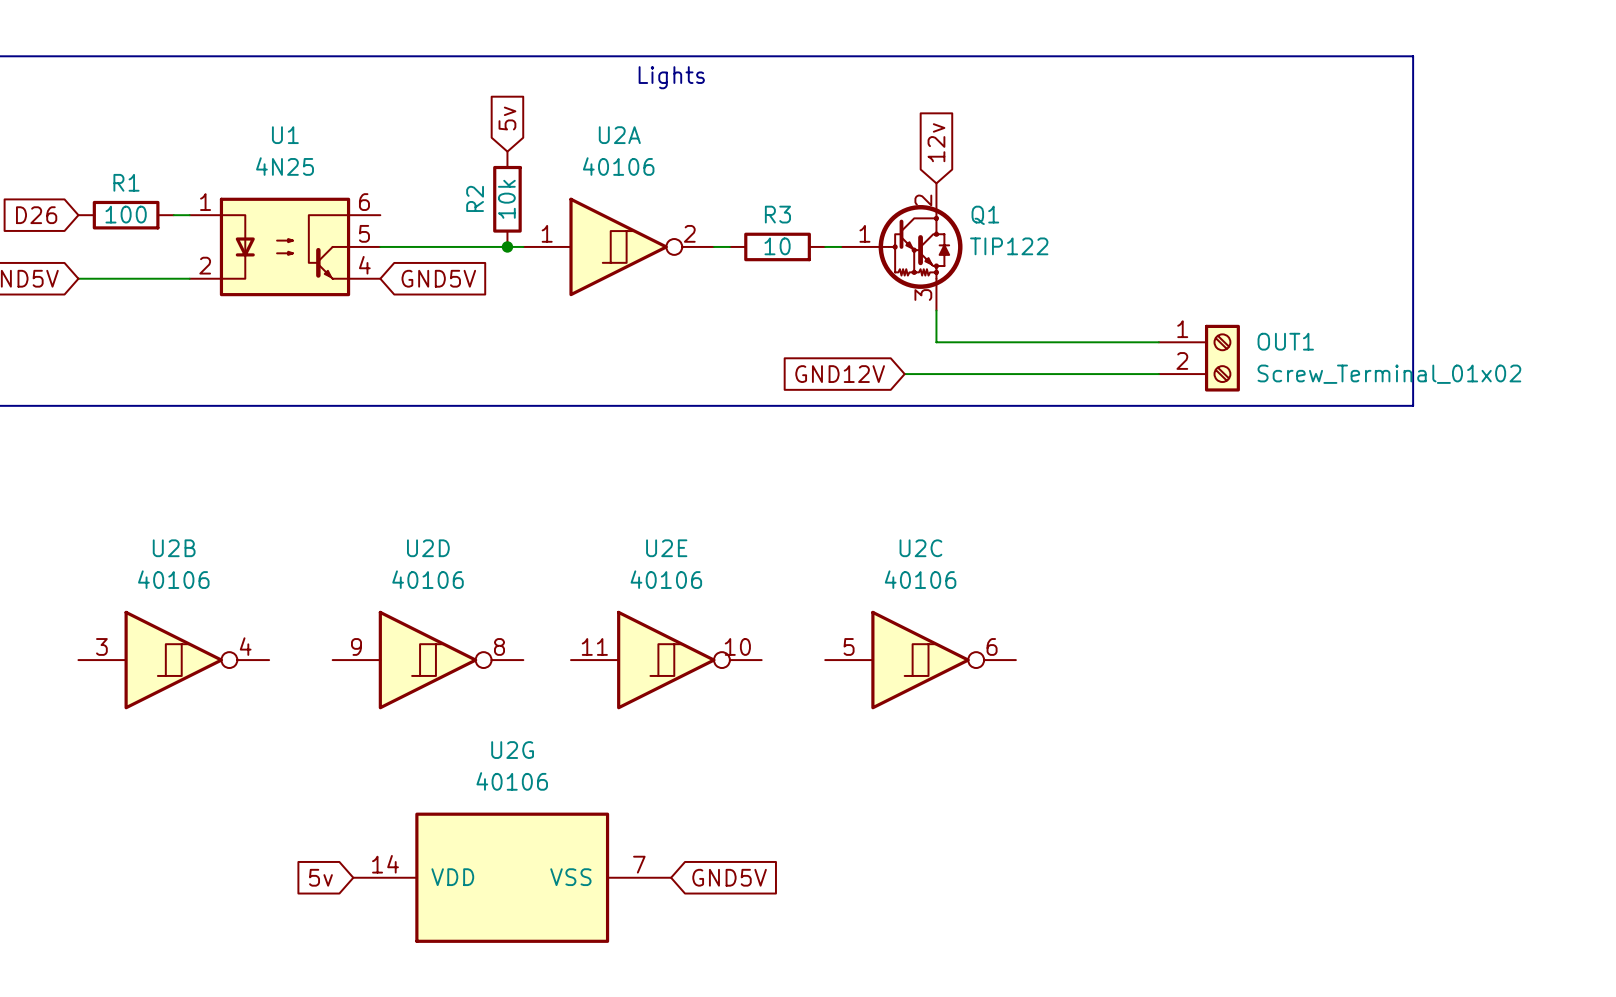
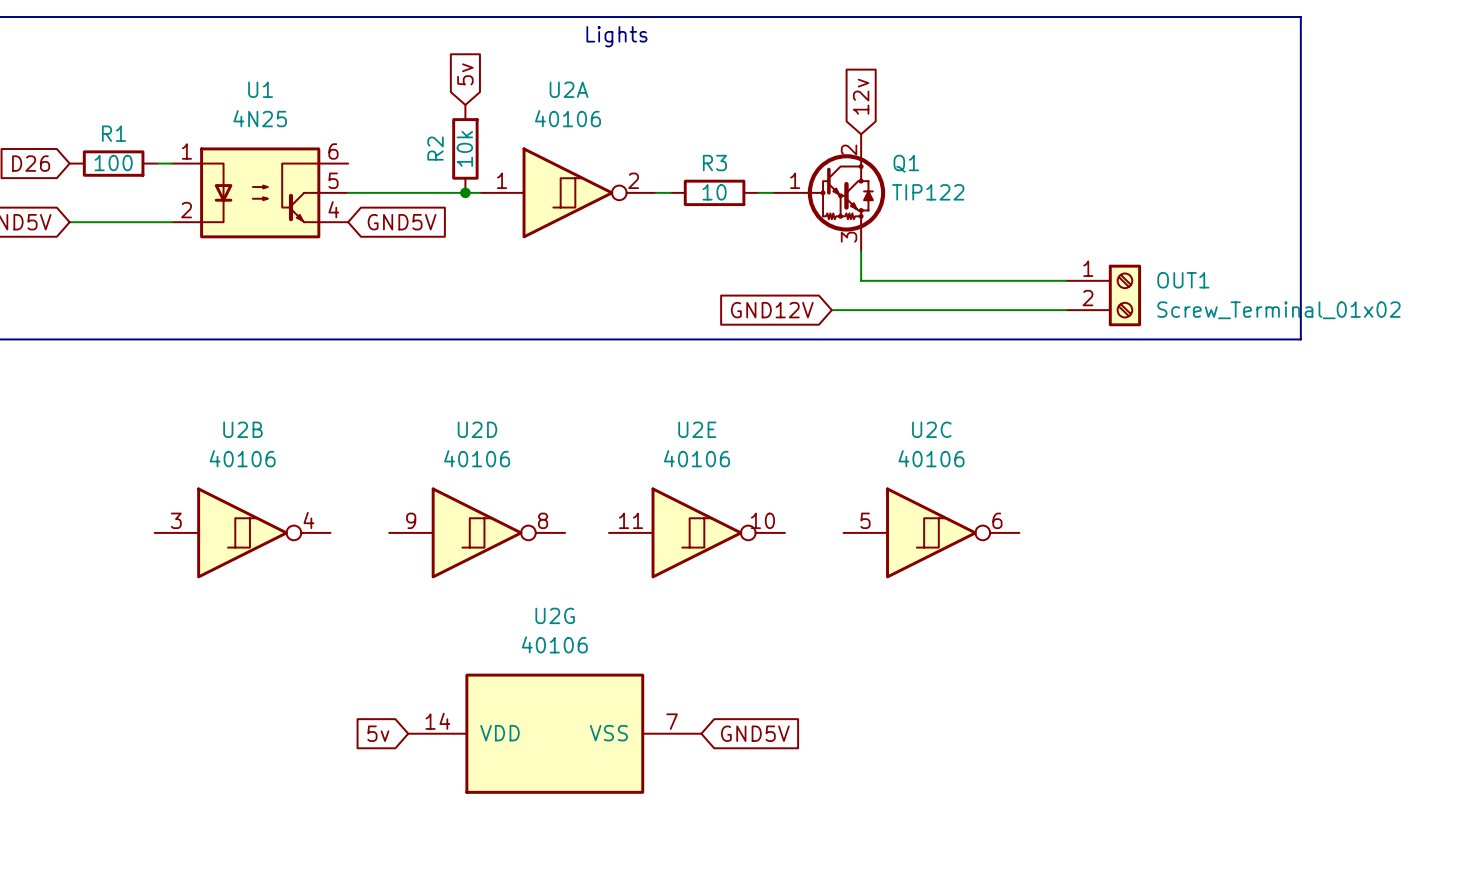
U2B position: (173, 660) -> (242, 532)
U2D position: (428, 660) -> (477, 532)
U2E position: (666, 660) -> (696, 532)
U2C position: (920, 660) -> (931, 532)
global label position: 5v (320, 877) -> 5v (378, 733)
U2G position: (512, 877) -> (554, 733)
global label position: GND5V (729, 877) -> GND5V (755, 733)

